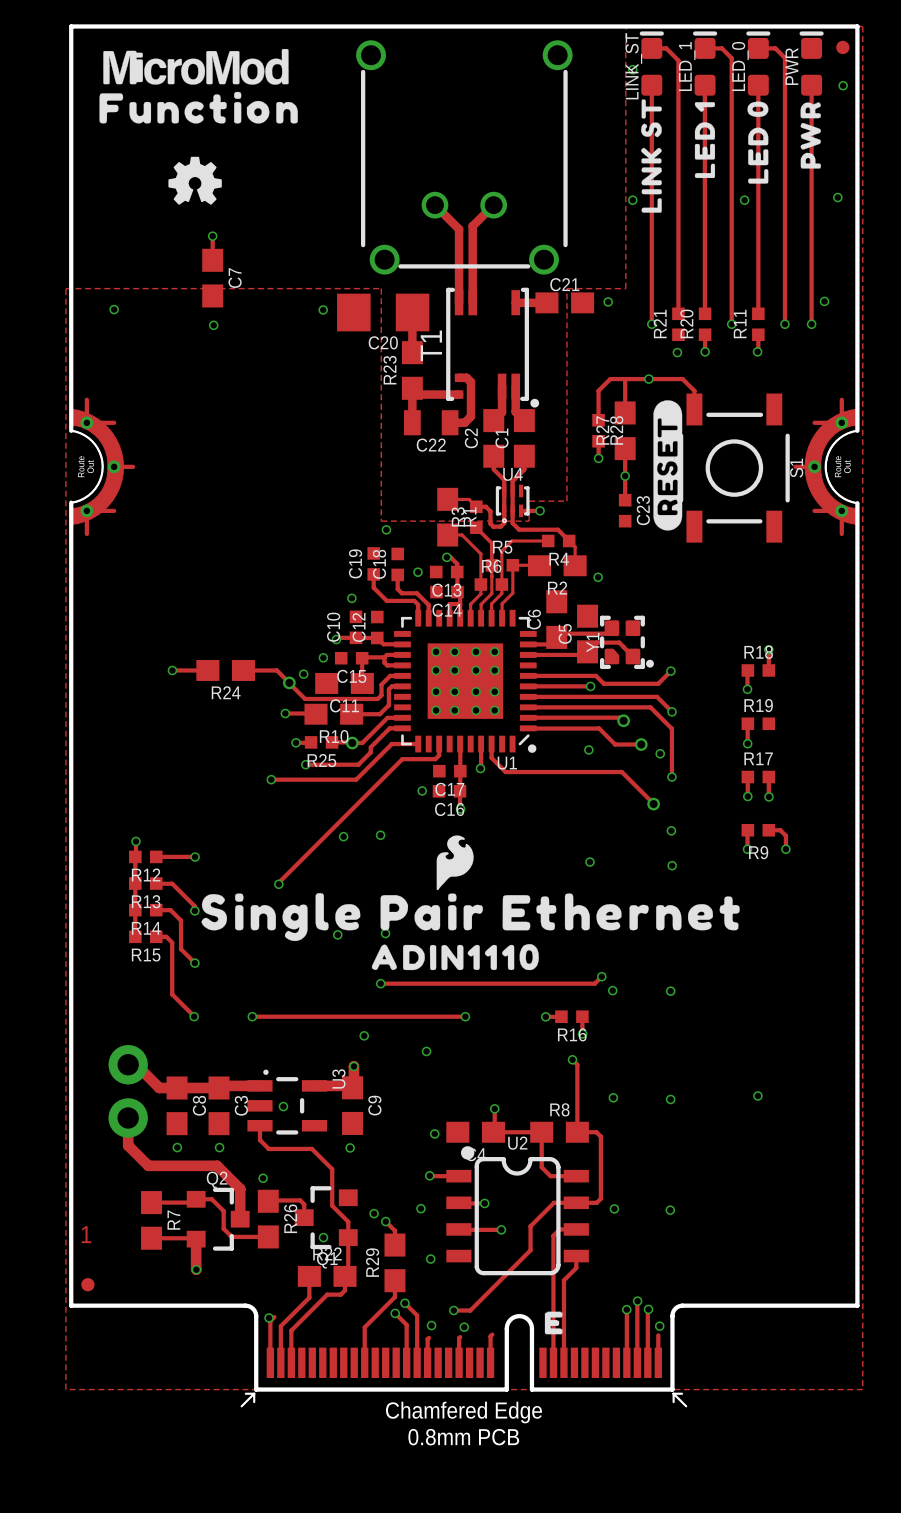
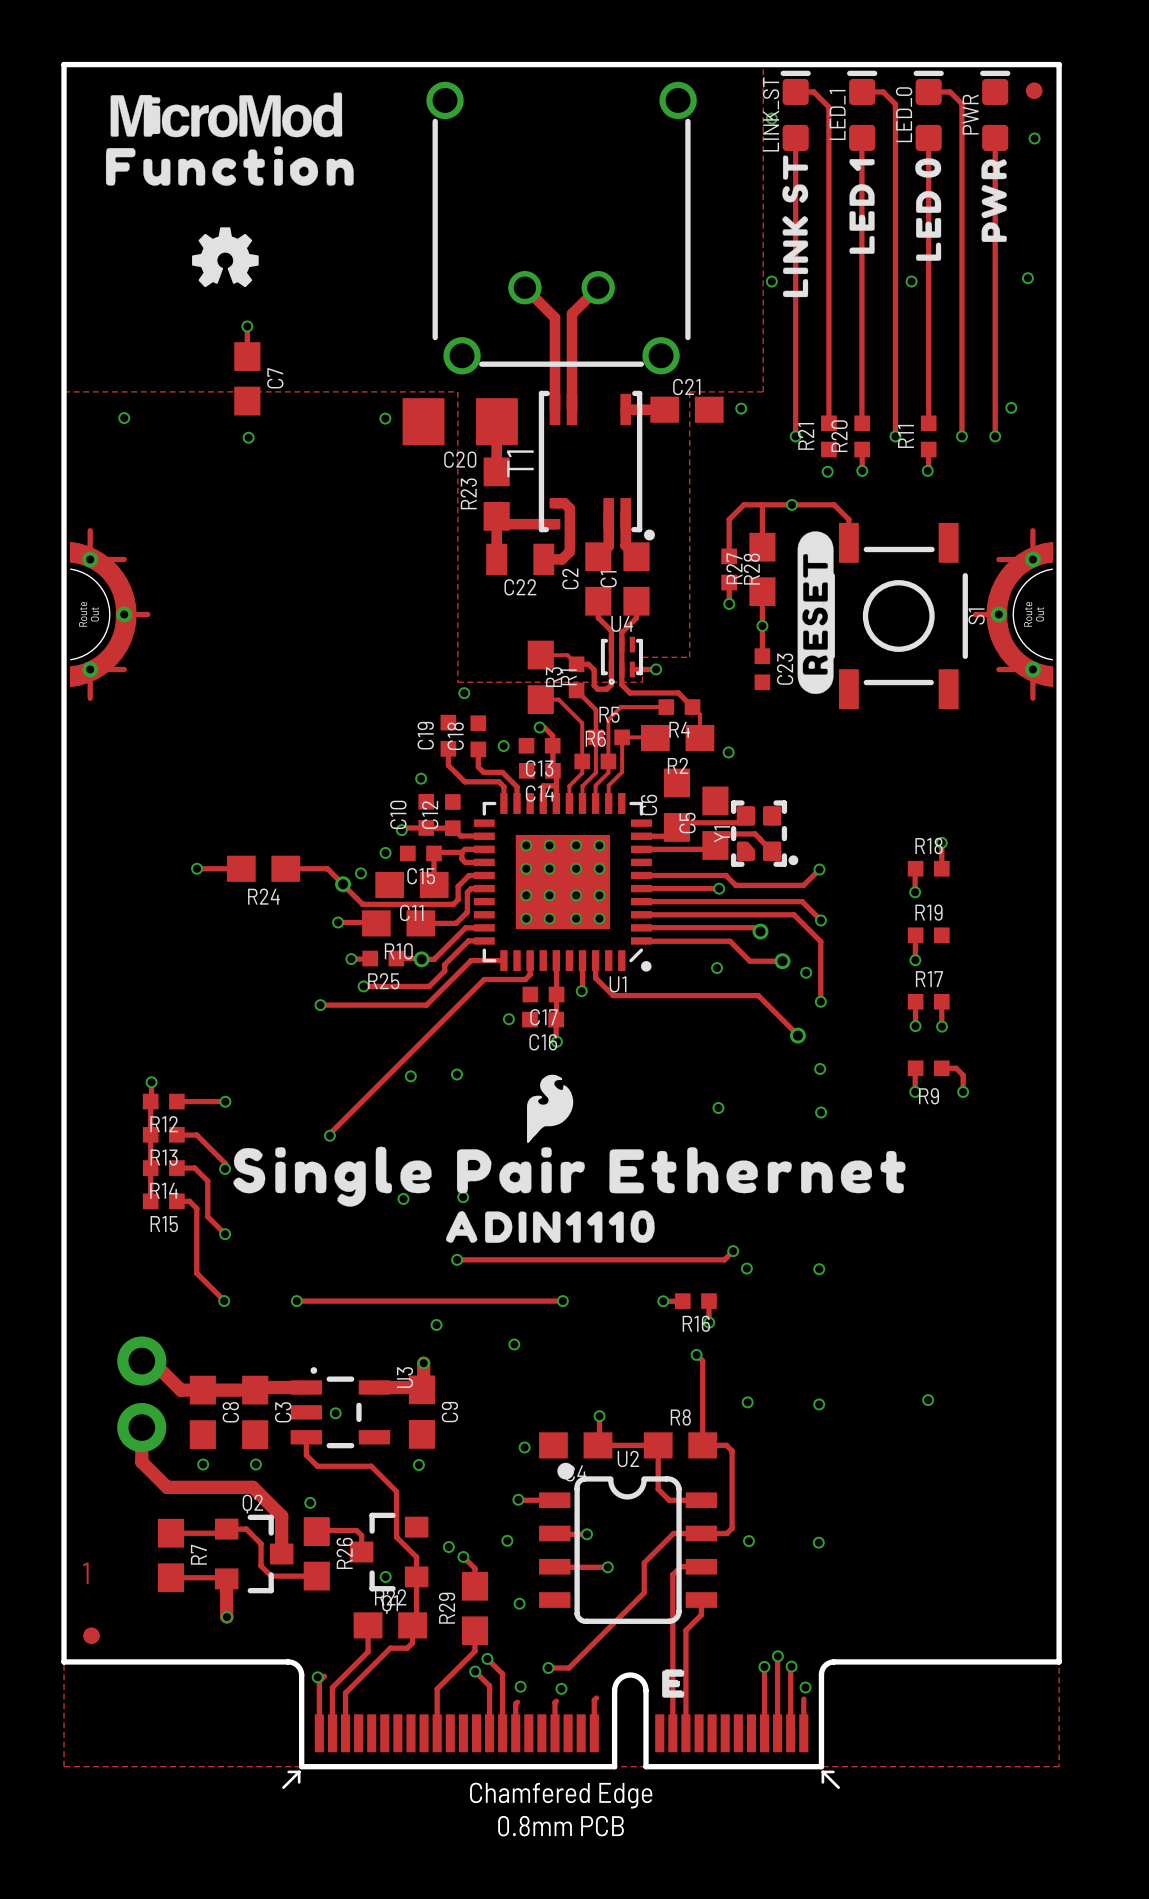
board edge: (71, 26) (71, 430) (80, 433) (92, 441) (100, 452) (102, 466) (100, 480) (92, 492) (80, 500) (71, 502) (71, 1305) -> (70, 64) (64, 64) (64, 1661) (70, 1661)
board edge: (857, 26) (857, 430) (848, 433) (836, 441) (828, 453) (825, 467) (828, 480) (836, 492) (848, 500) (857, 503) (857, 1305) -> (1052, 64) (1059, 64) (1059, 1661) (1052, 1661)

